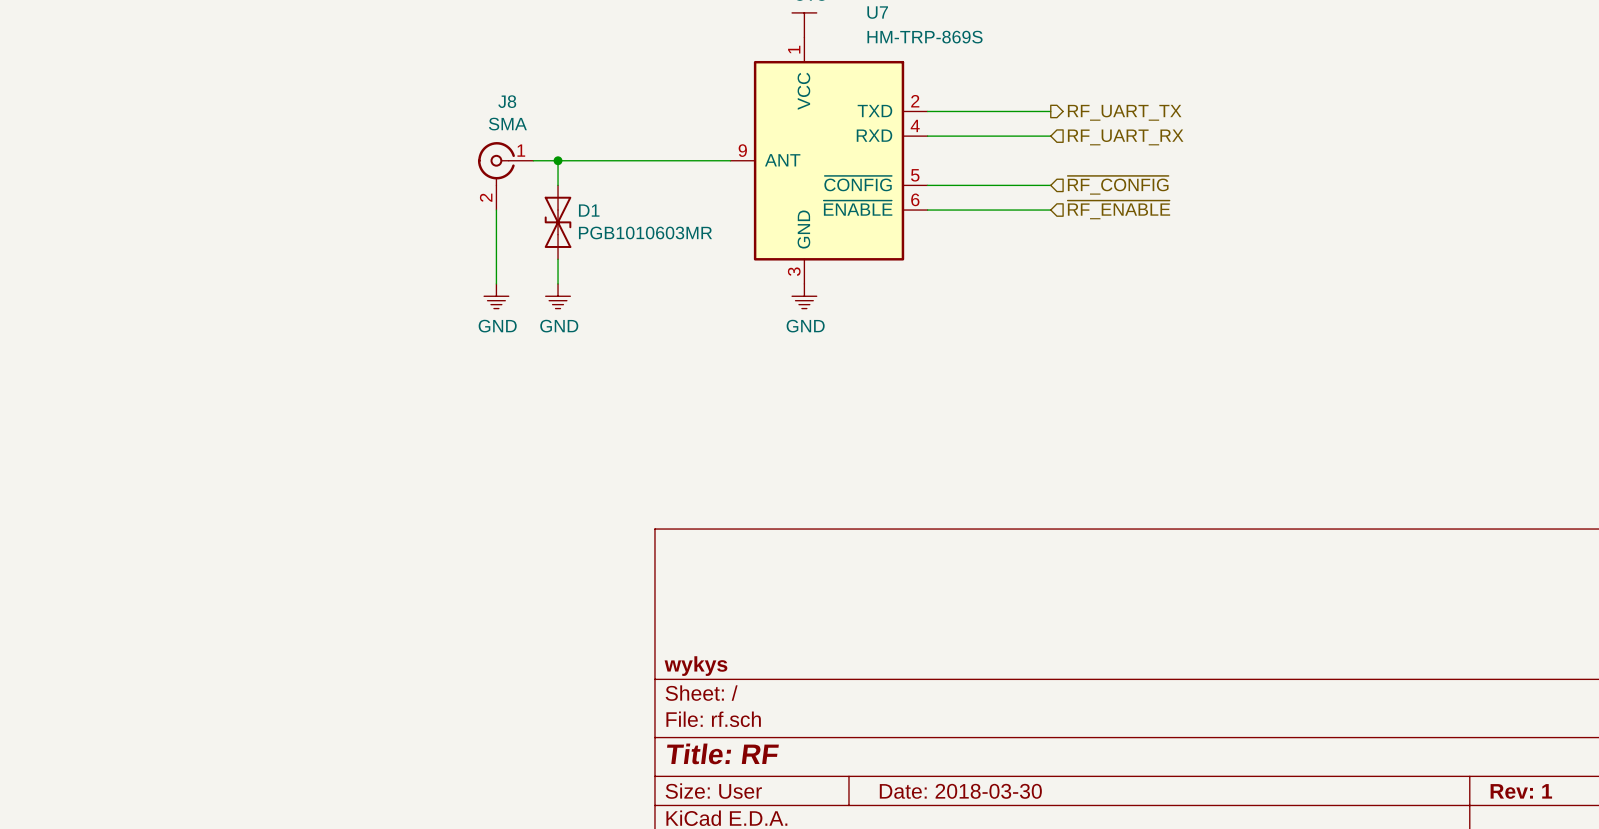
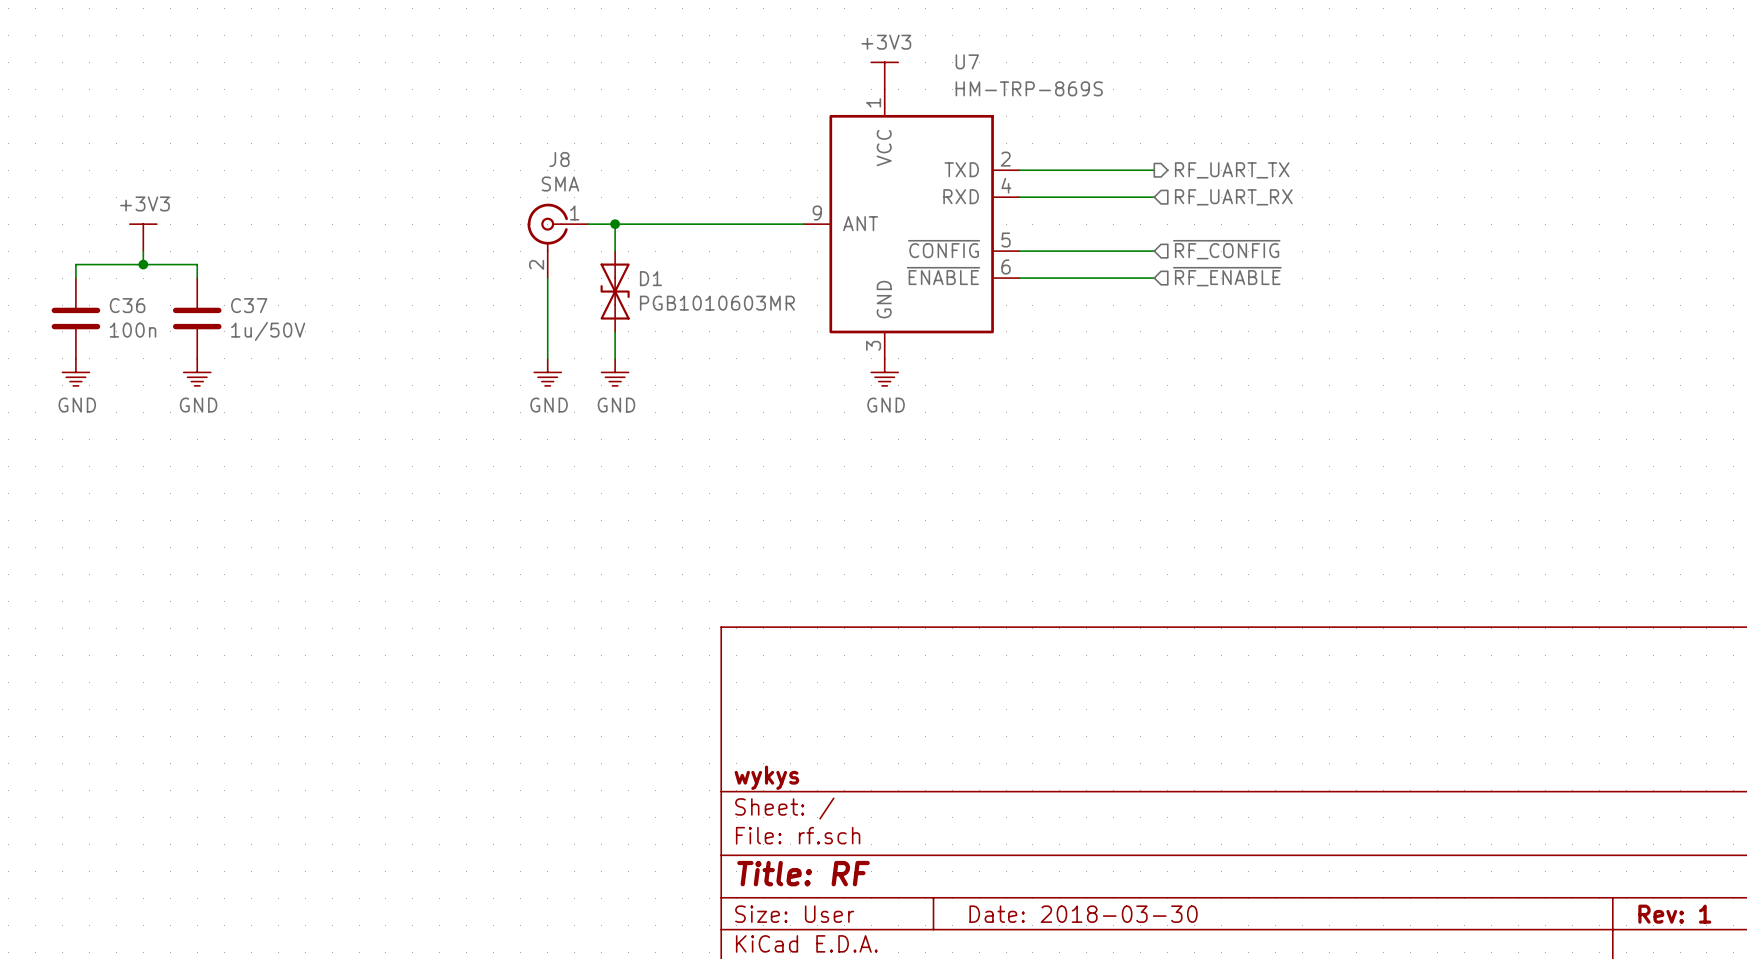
power symbol: none -> +3V3 (143, 237)
wire: none -> (143, 251) (143, 264)
junction: none -> (143, 264)
wire: none -> (75, 278) (75, 264) (197, 264) (197, 278)
C36: none -> 100n (75, 318)
C37: none -> 1u/50V (197, 318)
power symbol: none -> GND (75, 372)
power symbol: none -> GND (197, 372)

